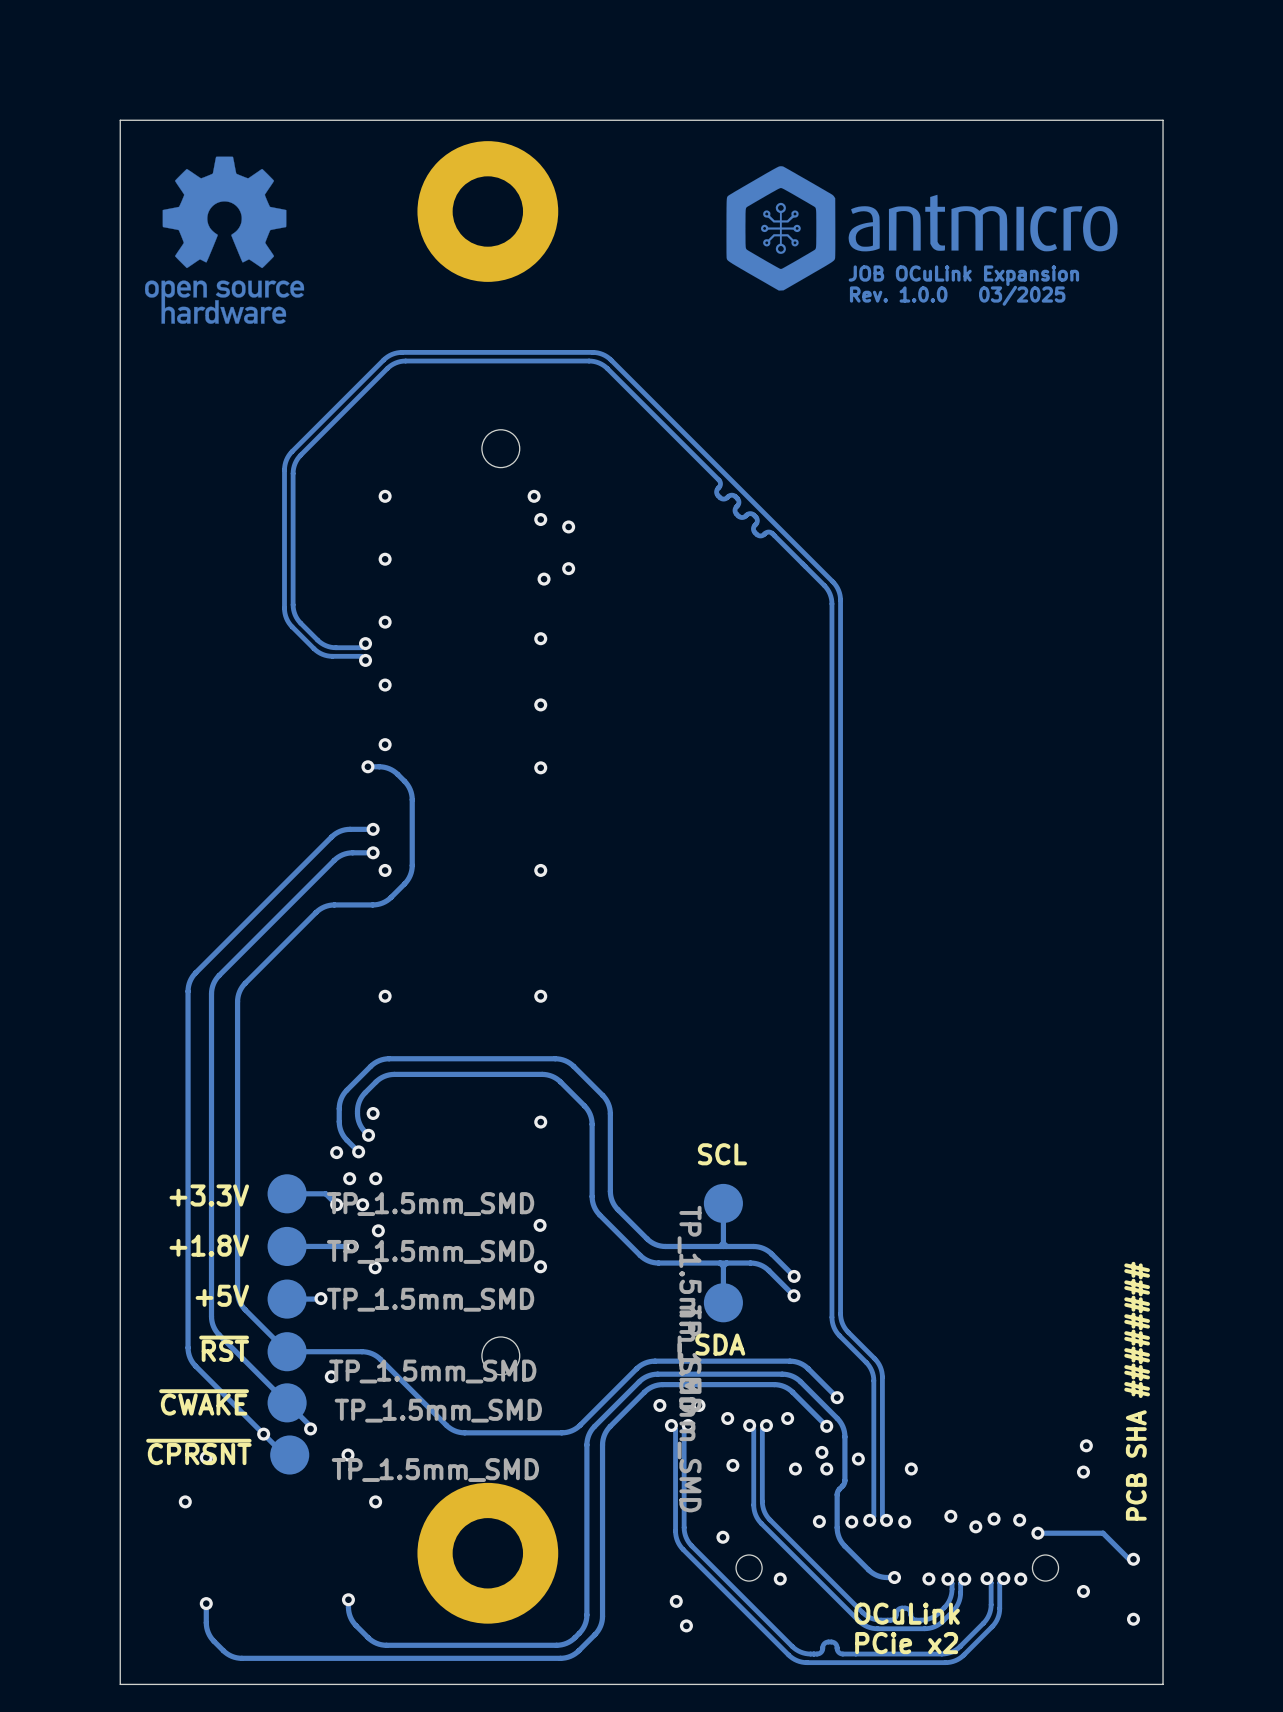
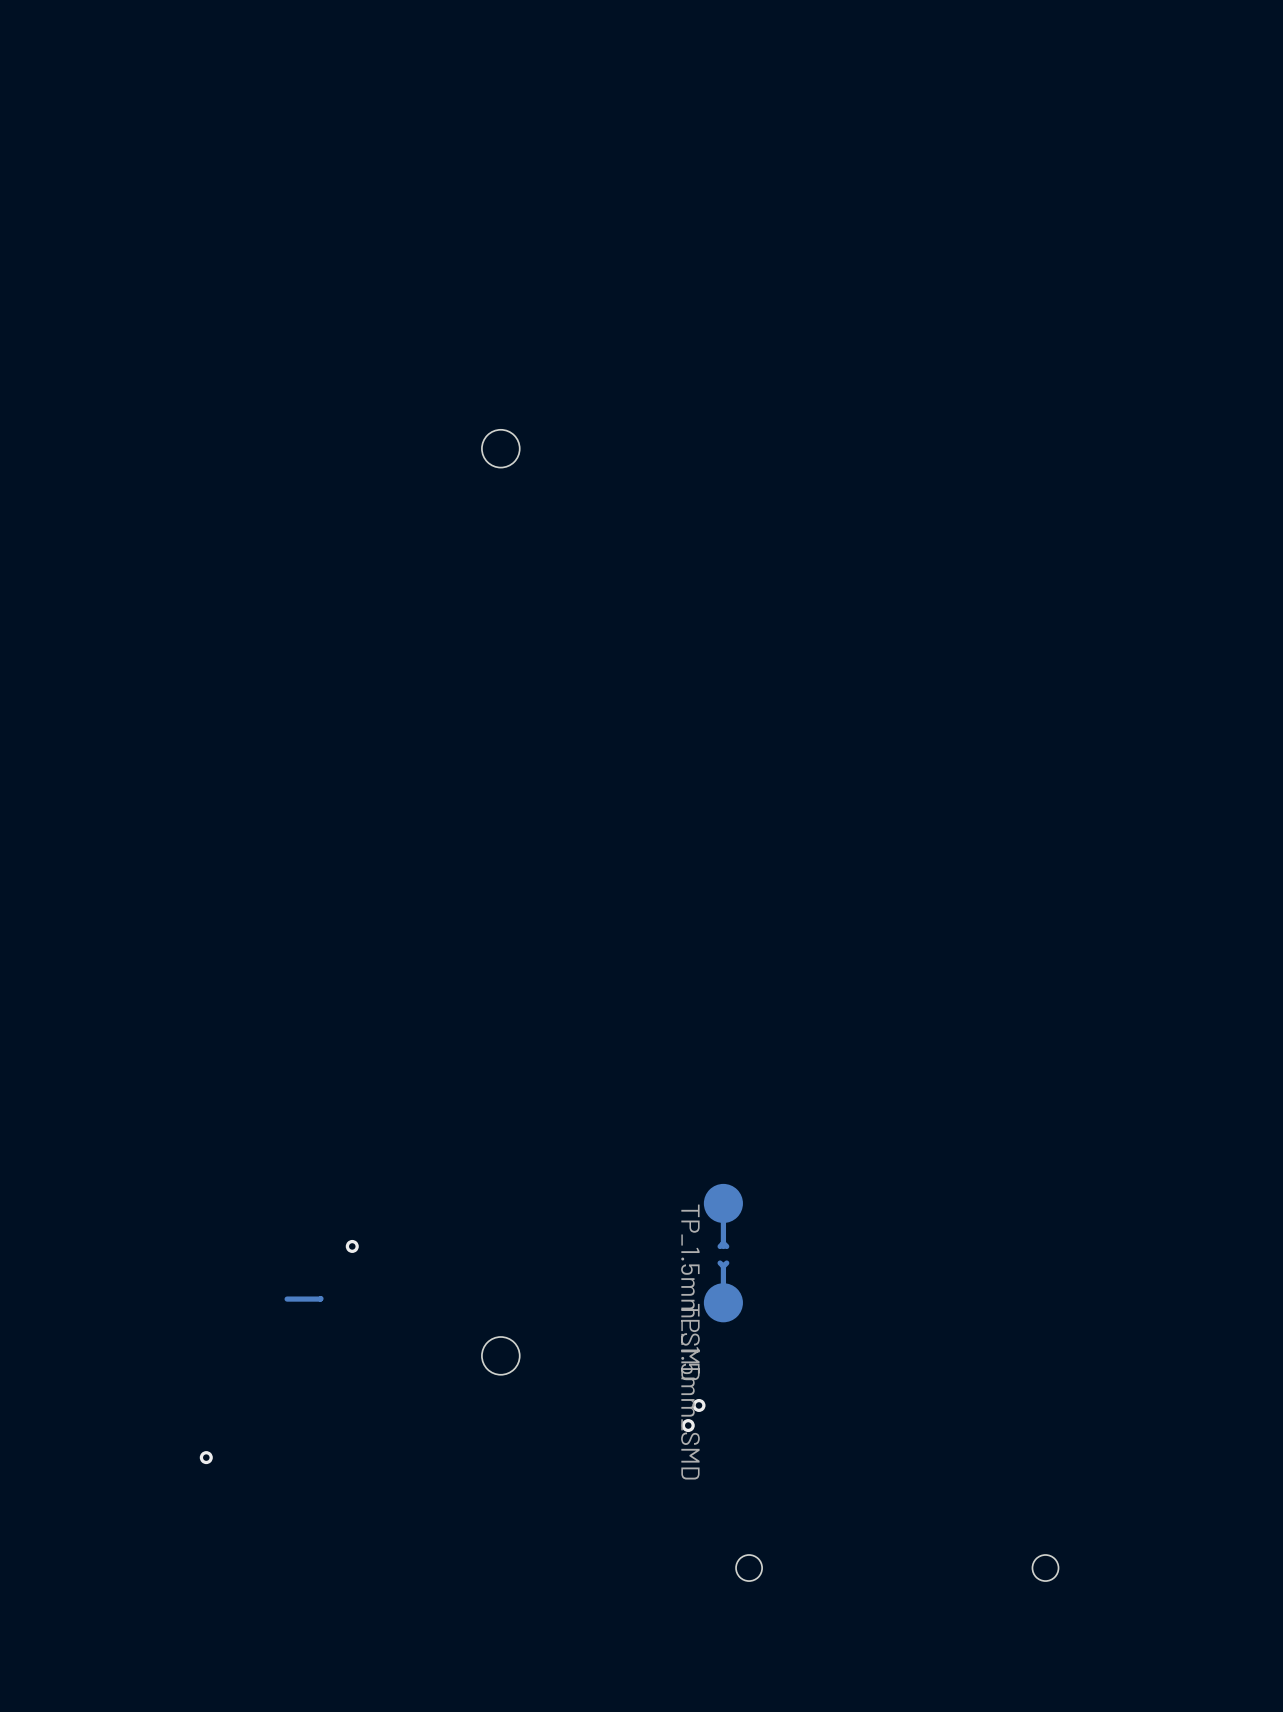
board edge: (1163, 120) (120, 120) (120, 1684) (1163, 1684) (1163, 120) -> none
drawing: [144, 156, 305, 324] -> none
drawing: [726, 166, 1118, 291] -> none
part: (487, 211) -> none
text: JOB OCuLink Expansion (963, 275) -> none
text: Rev. 1.0.0 03/2025 (957, 295) -> none
via: (385, 496) -> none
via: (534, 496) -> none
via: (540, 519) -> none
via: (568, 526) -> none
via: (385, 559) -> none
via: (568, 568) -> none
via: (544, 579) -> none
via: (385, 622) -> none
via: (540, 638) -> none
track: (365, 643) (361, 647) (326, 645) (300, 623) (295, 614) (293, 604) (293, 471) (300, 455) (387, 368) (403, 361) (589, 361) (601, 364) (719, 480) (720, 484) (716, 492) (719, 497) (724, 499) (731, 495) (737, 498) (738, 503) (735, 511) (738, 515) (742, 517) (750, 513) (755, 516) (757, 521) (753, 529) (756, 534) (761, 535) (767, 532) (771, 533) (828, 591) (831, 603) (831, 1317) (836, 1331) (867, 1364) (873, 1375) (873, 1516) (869, 1520) -> none
via: (365, 643) -> none
track: (365, 660) (361, 656) (329, 656) (320, 653) (292, 626) (286, 618) (284, 608) (284, 467) (292, 451) (383, 360) (397, 352) (592, 352) (604, 355) (836, 585) (840, 600) (840, 1316) (844, 1328) (876, 1360) (881, 1372) (882, 1516) (886, 1520) -> none
via: (365, 660) -> none
via: (385, 685) -> none
via: (540, 704) -> none
via: (385, 744) -> none
track: (367, 766) (381, 766) (391, 769) (404, 781) (410, 789) (412, 799) (412, 865) (409, 877) (389, 899) (380, 903) (331, 905) (319, 909) (245, 983) (238, 996) (237, 1291) (243, 1307) (287, 1351) (362, 1351) (374, 1354) (446, 1425) (459, 1432) (561, 1432) (571, 1430) (580, 1425) (638, 1367) (652, 1361) (794, 1361) (806, 1367) (837, 1397) -> none
via: (367, 766) -> none
via: (540, 767) -> none
track: (373, 829) (344, 829) (333, 835) (195, 972) (188, 988) (188, 1352) (195, 1366) (284, 1455) (289, 1455) -> none
via: (373, 829) -> none
track: (373, 852) (347, 853) (336, 858) (219, 975) (211, 991) (212, 1321) (219, 1334) (310, 1426) (310, 1428) -> none
via: (373, 852) -> none
via: (385, 870) -> none
via: (540, 870) -> none
via: (385, 996) -> none
via: (540, 996) -> none
via: (373, 1113) -> none
via: (540, 1122) -> none
track: (368, 1135) (358, 1121) (358, 1103) (363, 1094) (375, 1082) (386, 1075) (542, 1074) (552, 1076) (560, 1082) (584, 1105) (590, 1116) (592, 1196) (595, 1208) (640, 1255) (656, 1262) (758, 1264) (767, 1268) (793, 1295) -> none
via: (368, 1135) -> none
track: (358, 1151) (341, 1131) (339, 1103) (346, 1090) (370, 1066) (379, 1060) (389, 1058) (562, 1059) (573, 1066) (602, 1095) (608, 1103) (610, 1113) (611, 1198) (616, 1207) (647, 1238) (662, 1246) (760, 1247) (769, 1252) (794, 1276) -> none
via: (358, 1151) -> none
via: (336, 1152) -> none
text: SCL (722, 1154) -> none
via: (349, 1178) -> none
via: (375, 1178) -> none
track: (287, 1193) (325, 1193) (336, 1204) -> none
part: TP_1.5mm_SMD (287, 1193) -> none
text: +3.3V (209, 1195) -> none
via: (336, 1204) -> none
via: (362, 1204) -> none
via: (540, 1225) -> none
via: (378, 1230) -> none
text: +1.8V (209, 1245) -> none
part: TP_1.5mm_SMD (287, 1246) -> none
track: (352, 1246) (287, 1246) -> none
via: (540, 1266) -> none
via: (375, 1267) -> none
via: (794, 1276) -> none
text: +5V (222, 1295) -> none
via: (793, 1295) -> none
via: (321, 1298) -> none
part: TP_1.5mm_SMD (287, 1299) -> none
text: SDA (720, 1344) -> none
text: ~{RST} (224, 1348) -> none
part: TP_1.5mm_SMD (287, 1351) -> none
via: (331, 1376) -> none
text: PCB SHA ######## (1137, 1391) -> none
via: (837, 1397) -> none
text: ~{CWAKE} (204, 1402) -> none
part: TP_1.5mm_SMD (287, 1402) -> none
via: (659, 1405) -> none
via: (727, 1418) -> none
via: (787, 1418) -> none
track: (671, 1425) (675, 1429) (675, 1531) (678, 1543) (788, 1655) (797, 1660) (807, 1662) (945, 1662) (955, 1660) (963, 1655) (996, 1620) (999, 1610) (999, 1582) (1003, 1578) -> none
via: (671, 1425) -> none
track: (688, 1425) (684, 1429) (684, 1527) (687, 1539) (798, 1650) (808, 1653) (818, 1653) (821, 1651) (824, 1643) (831, 1641) (835, 1643) (837, 1651) (842, 1653) (941, 1654) (951, 1652) (960, 1646) (988, 1617) (991, 1607) (991, 1582) (987, 1578) -> none
track: (749, 1425) (753, 1429) (753, 1505) (756, 1517) (862, 1624) (877, 1628) (924, 1628) (934, 1626) (956, 1607) (960, 1597) (960, 1583) (964, 1579) -> none
via: (749, 1425) -> none
track: (766, 1425) (762, 1429) (762, 1501) (765, 1513) (864, 1614) (875, 1619) (891, 1620) (895, 1617) (898, 1609) (905, 1608) (909, 1610) (914, 1619) (931, 1618) (944, 1607) (950, 1599) (952, 1583) (947, 1579) -> none
via: (766, 1425) -> none
track: (826, 1426) (790, 1390) (779, 1385) (662, 1384) (646, 1390) (610, 1426) (603, 1437) (602, 1621) (594, 1634) (577, 1652) (568, 1657) (239, 1658) (227, 1653) (210, 1637) (206, 1625) (206, 1603) -> none
via: (826, 1426) -> none
via: (310, 1428) -> none
via: (263, 1434) -> none
via: (1086, 1445) -> none
text: ~{CPRSNT} (198, 1451) -> none
via: (821, 1452) -> none
via: (348, 1454) -> none
part: TP_1.5mm_SMD (289, 1455) -> none
via: (858, 1459) -> none
via: (732, 1465) -> none
via: (795, 1468) -> none
via: (826, 1468) -> none
via: (911, 1468) -> none
via: (1083, 1472) -> none
via: (185, 1501) -> none
via: (375, 1501) -> none
via: (950, 1516) -> none
via: (994, 1519) -> none
via: (869, 1520) -> none
via: (886, 1520) -> none
via: (1019, 1520) -> none
via: (819, 1521) -> none
via: (851, 1521) -> none
via: (904, 1521) -> none
via: (975, 1526) -> none
track: (1037, 1533) (1103, 1533) (1129, 1559) -> none
via: (1037, 1533) -> none
via: (722, 1537) -> none
part: (487, 1553) -> none
via: (1133, 1559) -> none
track: (894, 1577) (881, 1577) (872, 1573) (840, 1539) (837, 1530) (837, 1494) (844, 1481) (843, 1429) (837, 1418) (798, 1380) (782, 1374) (657, 1374) (647, 1376) (639, 1381) (594, 1426) (588, 1437) (586, 1617) (582, 1629) (571, 1640) (556, 1645) (381, 1644) (370, 1639) (352, 1621) (348, 1612) (348, 1599) -> none
via: (894, 1577) -> none
via: (780, 1578) -> none
via: (928, 1578) -> none
via: (987, 1578) -> none
via: (1003, 1578) -> none
via: (947, 1579) -> none
via: (964, 1579) -> none
via: (1020, 1579) -> none
via: (1083, 1591) -> none
via: (348, 1599) -> none
via: (676, 1601) -> none
via: (206, 1603) -> none
text: OCuLink (907, 1613) -> none
via: (1133, 1619) -> none
via: (686, 1625) -> none
text: PCie x2 (906, 1643) -> none

